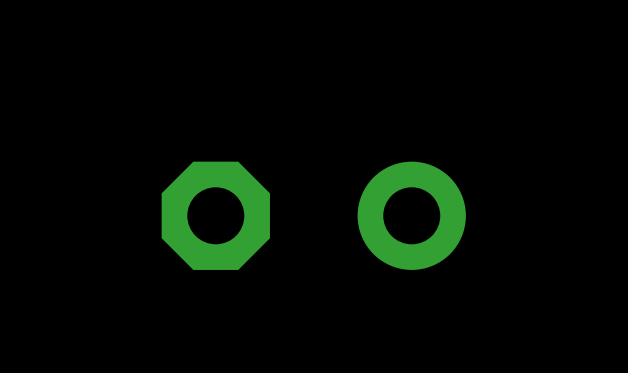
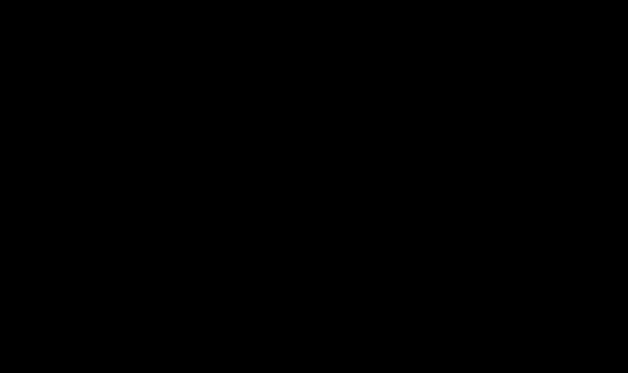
part: (313, 215) -> none

